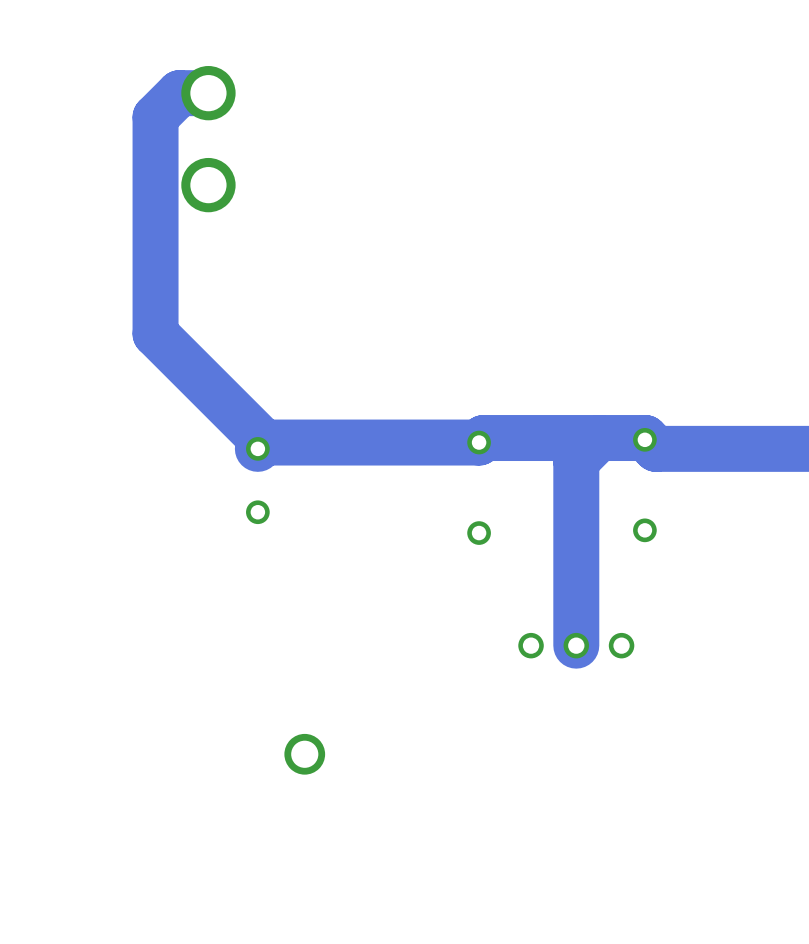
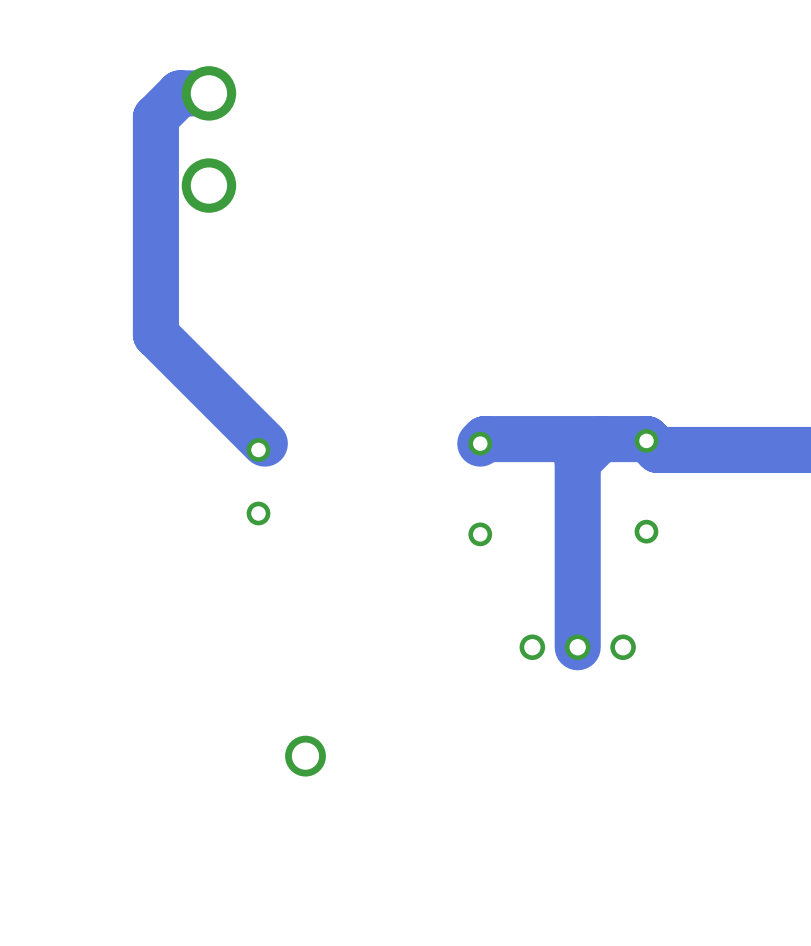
track: (479, 442) (264, 442) (257, 448) -> none

